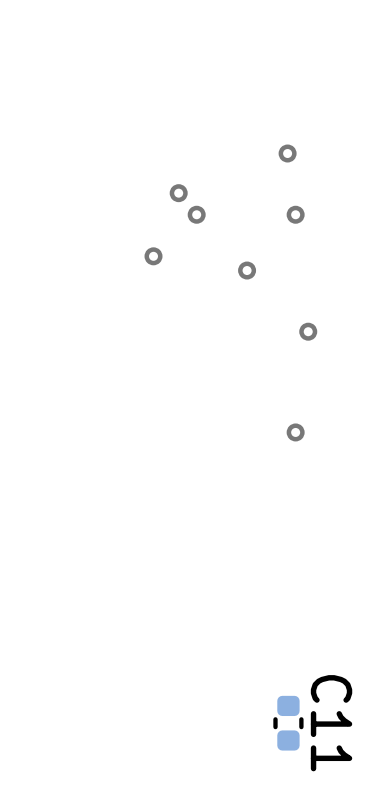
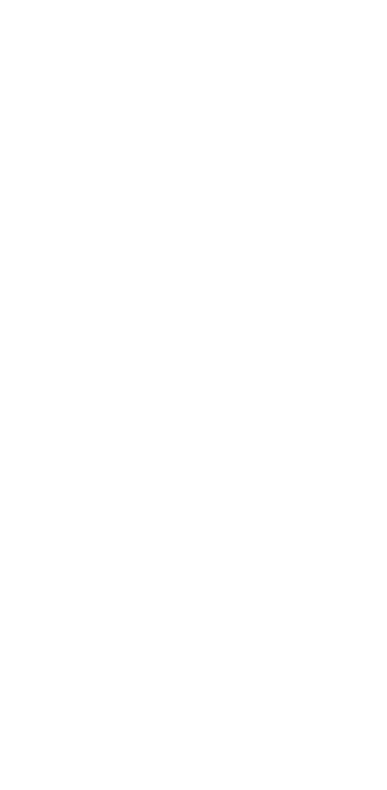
via: (287, 153) -> none
via: (178, 193) -> none
via: (196, 214) -> none
via: (295, 214) -> none
via: (153, 256) -> none
via: (247, 270) -> none
via: (308, 331) -> none
via: (295, 432) -> none
C11: (288, 723) -> none

